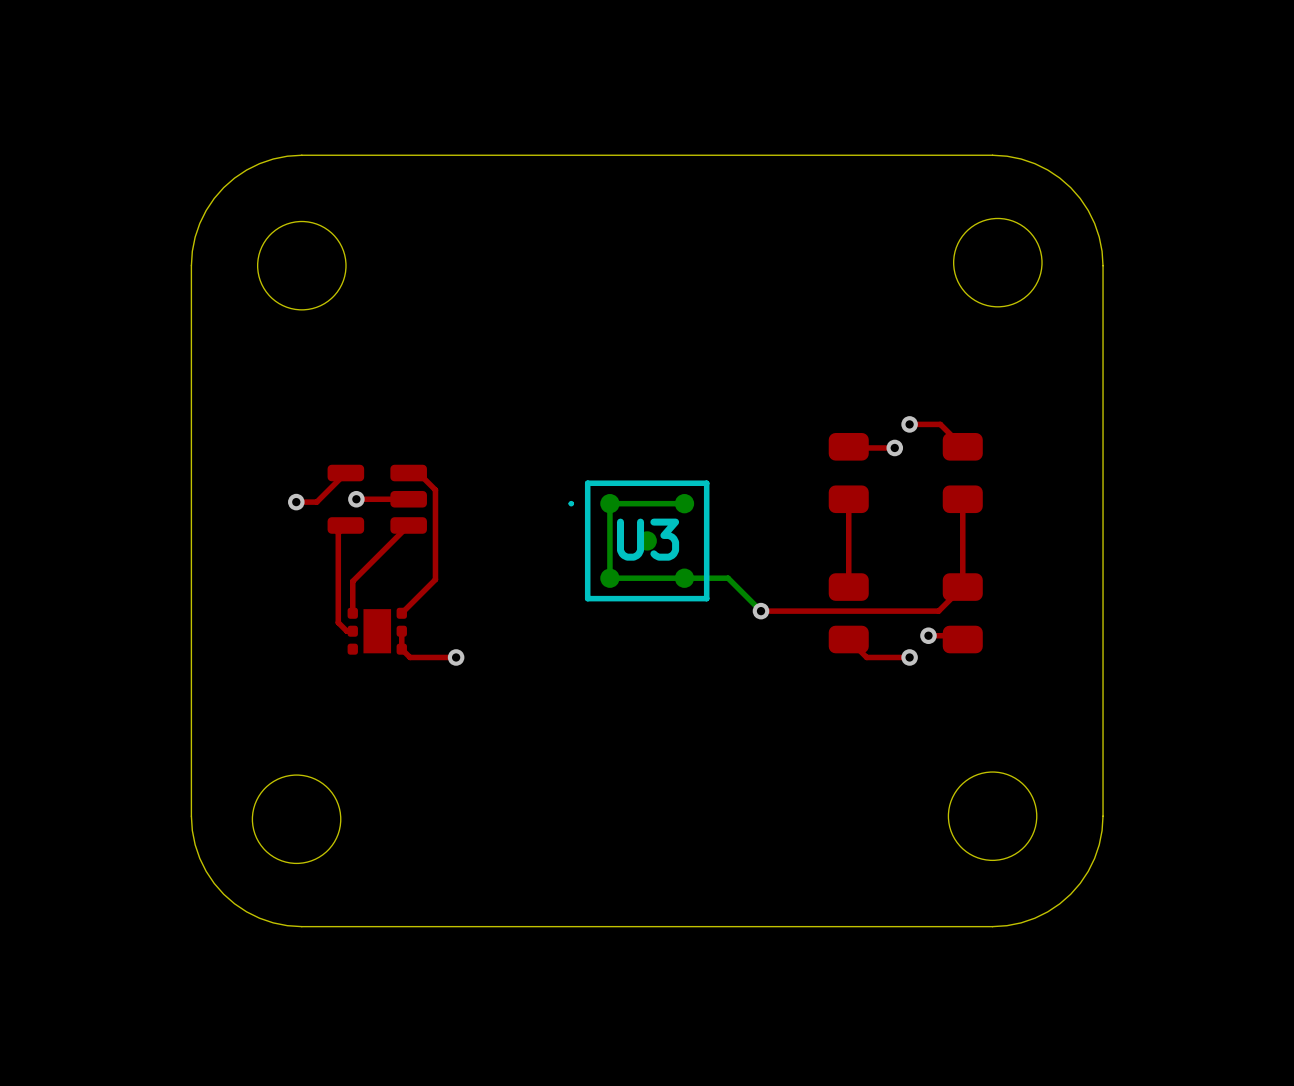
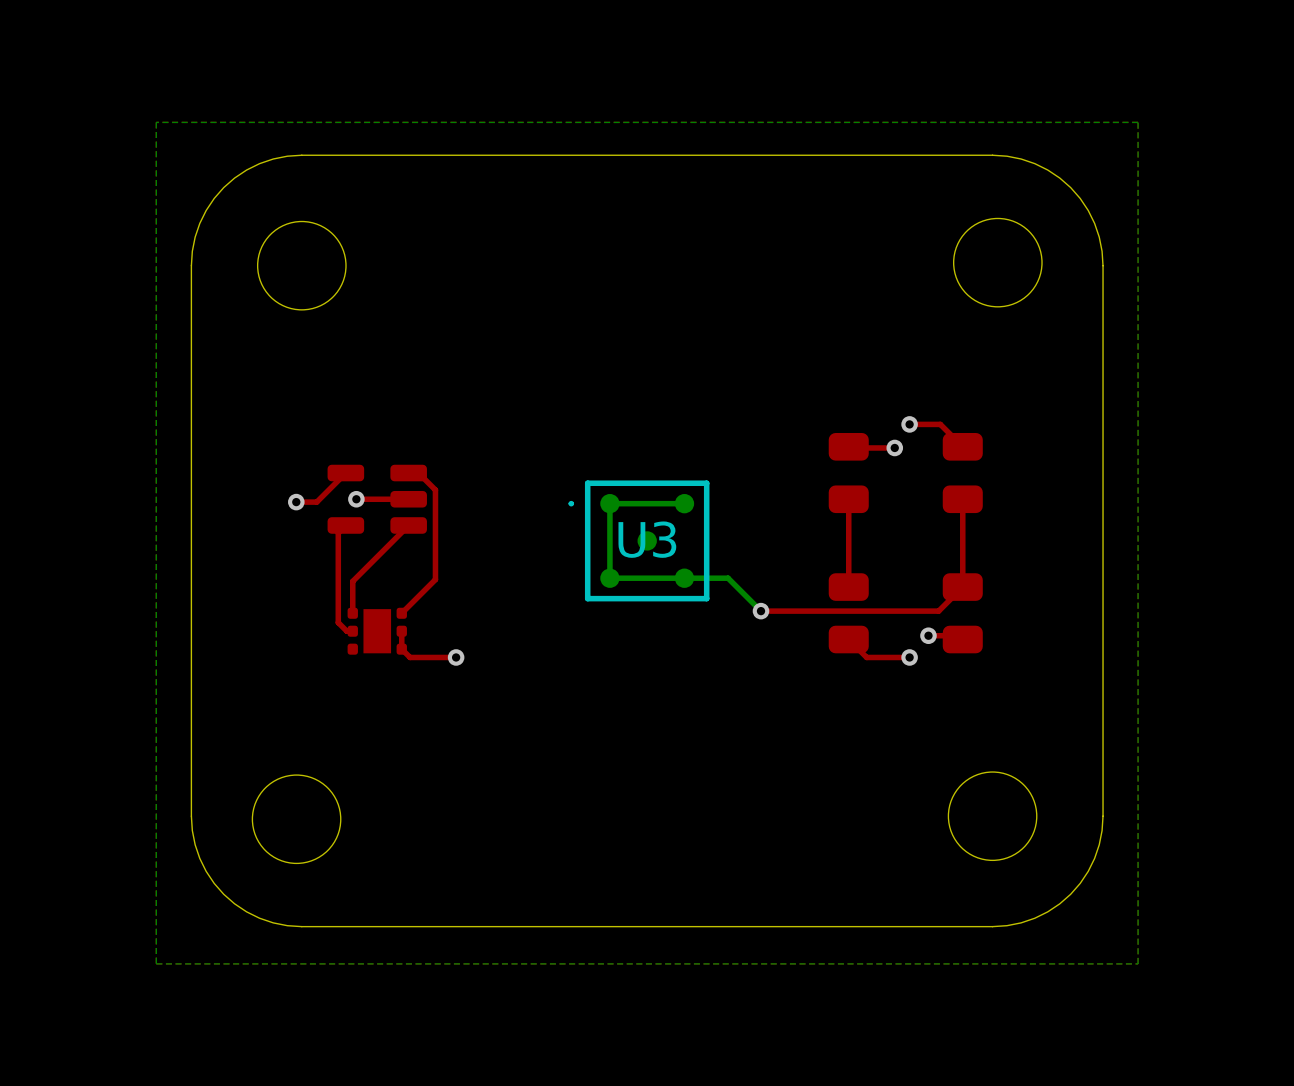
bottom zone outline: none -> (1138, 122) (156, 122) (156, 963) (1138, 963) (1138, 122)

